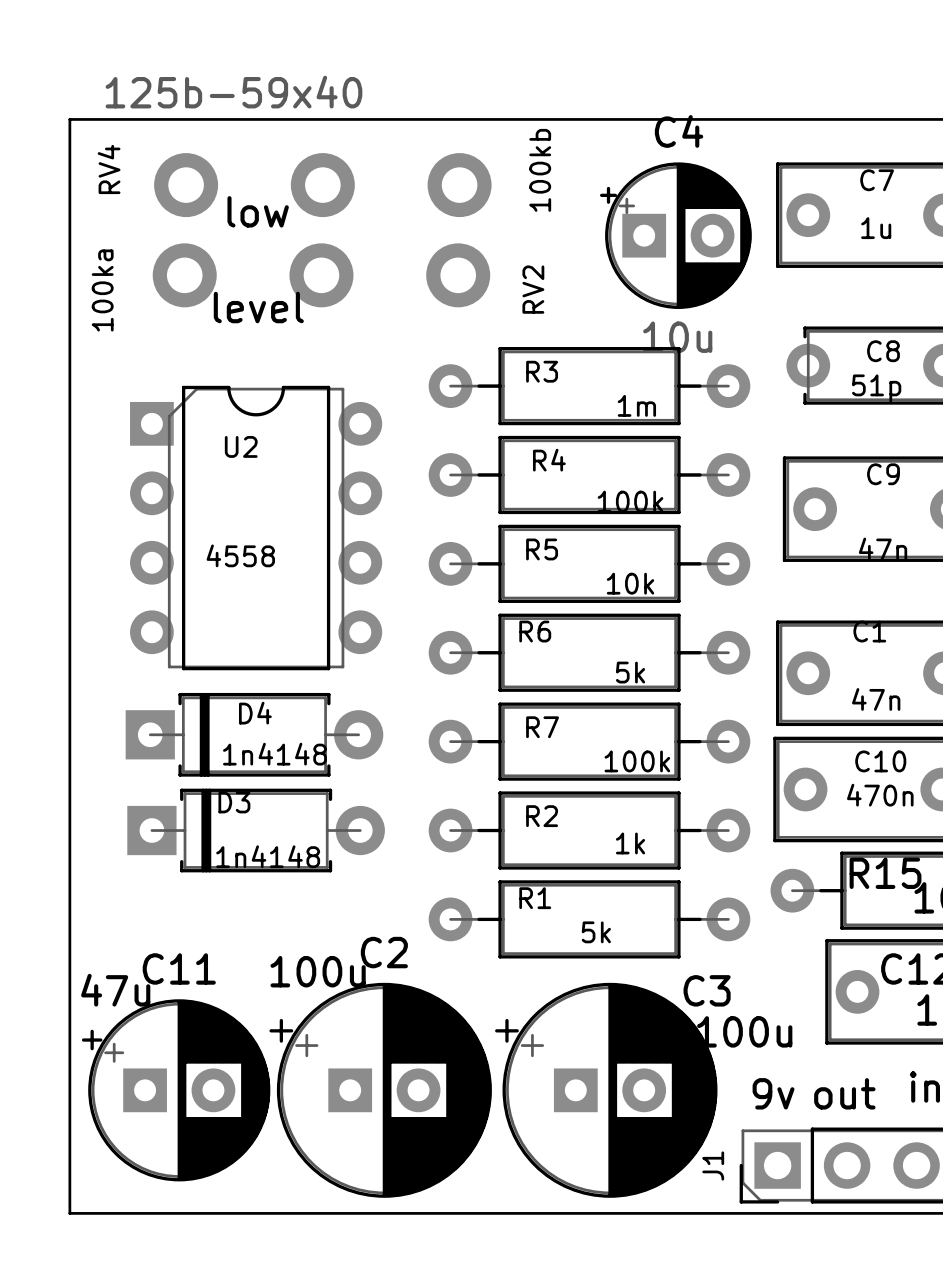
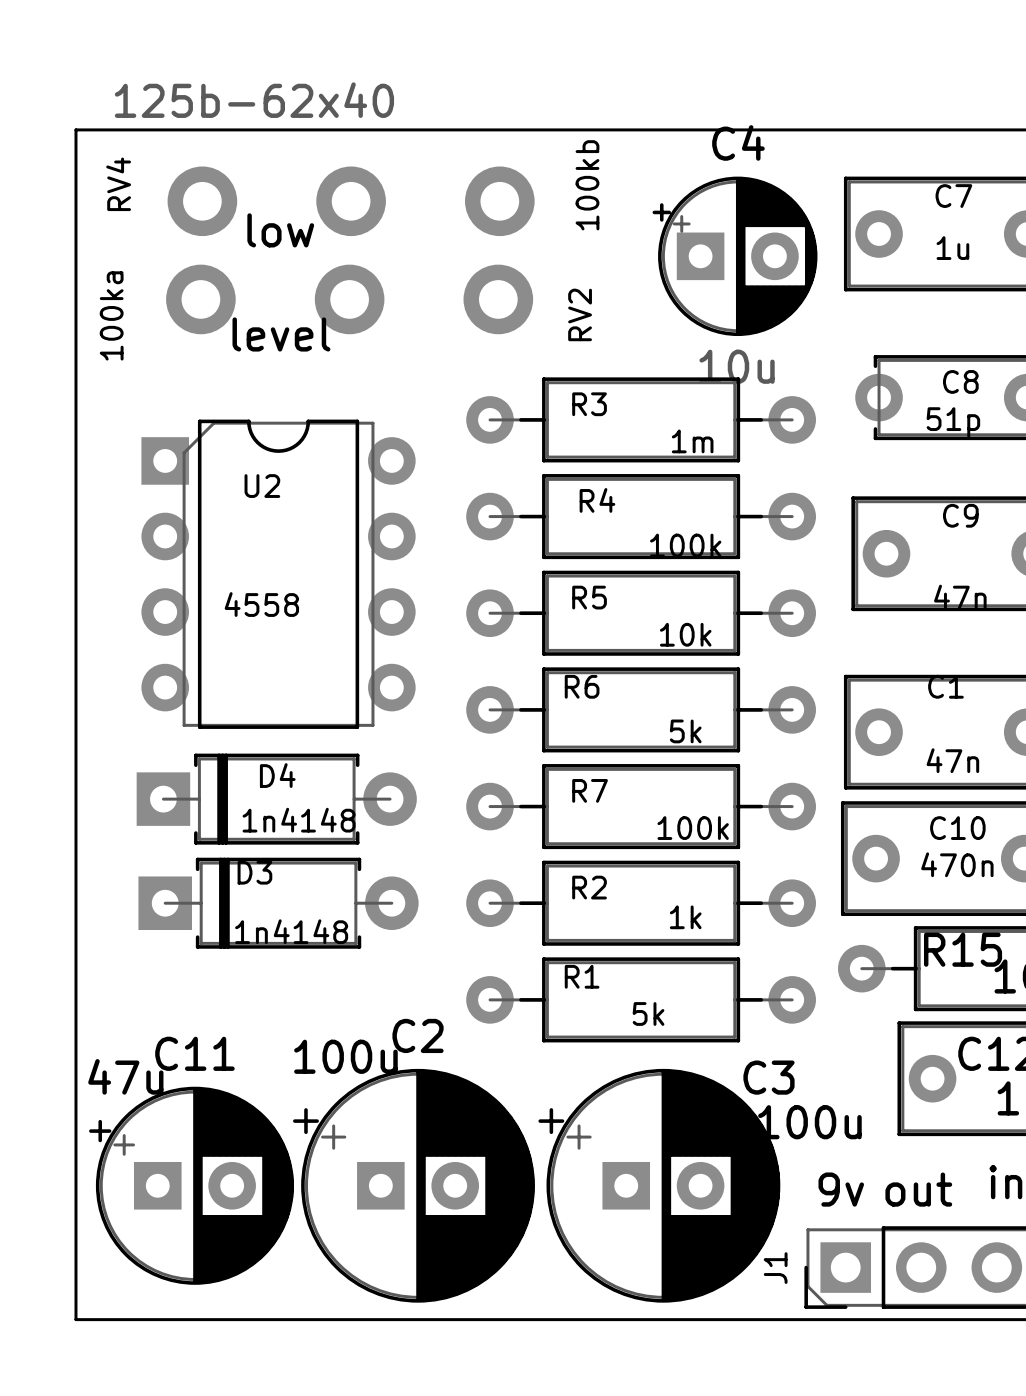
text: 125b-59x40 (233, 92) -> 125b-62x40 (254, 100)

